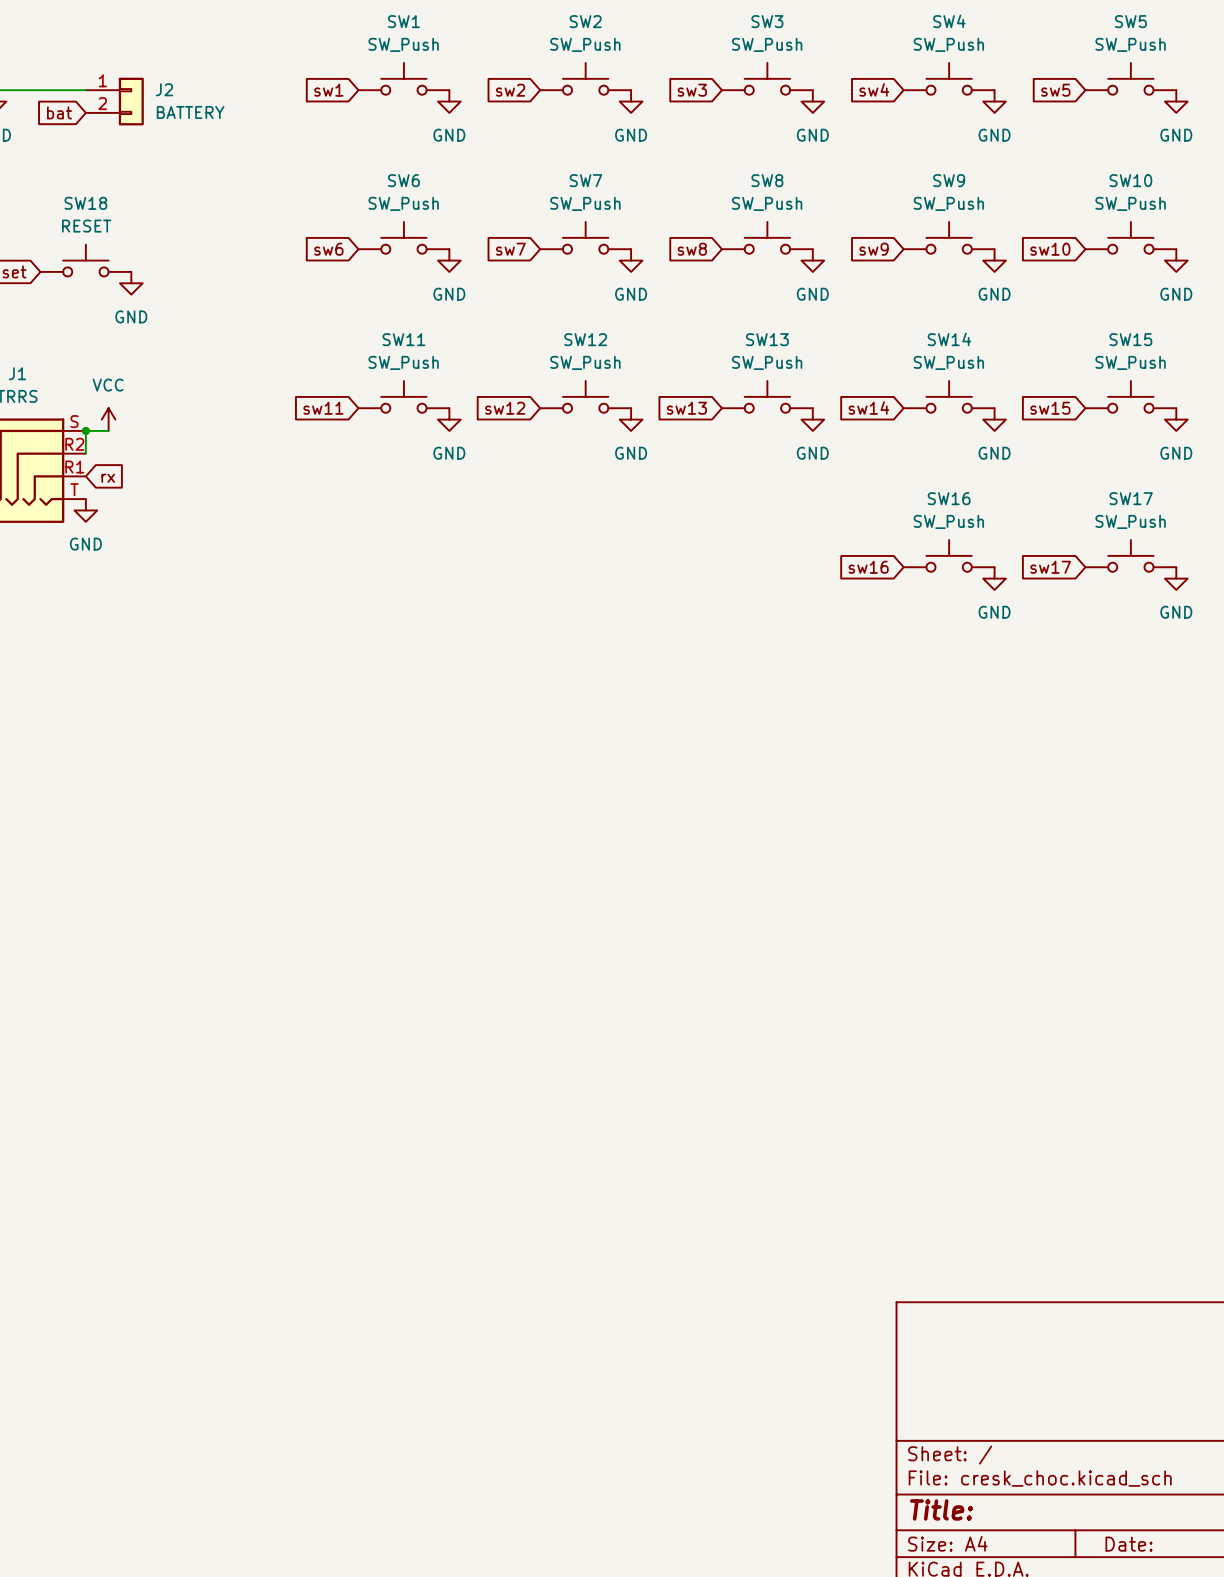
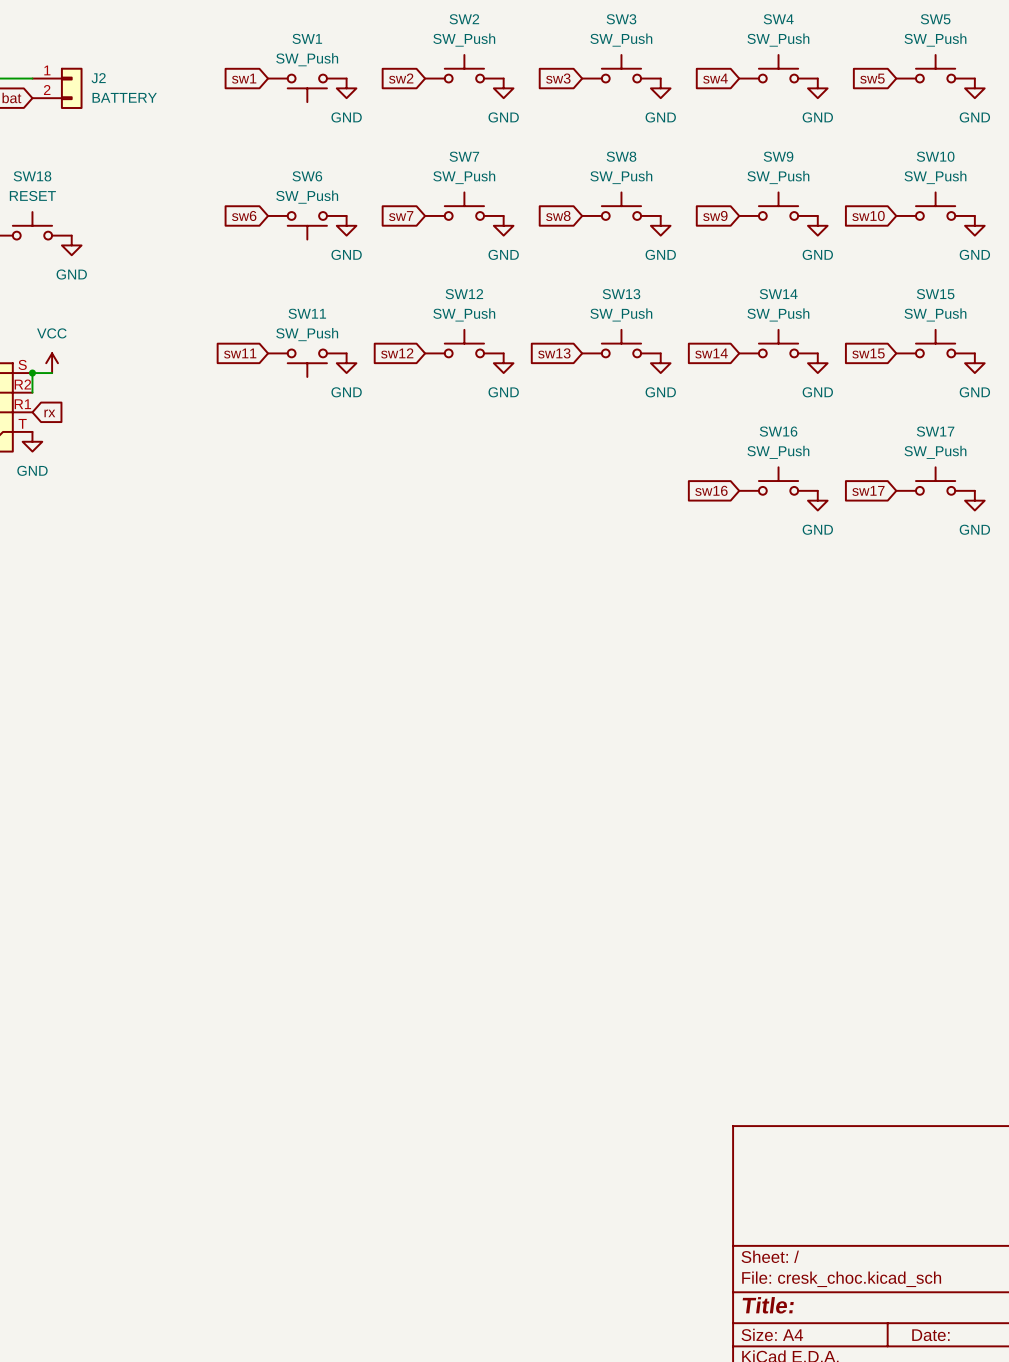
SW1 rotation: 0° (403, 78) -> 180° (307, 88)
SW6 rotation: 0° (403, 237) -> 180° (307, 225)
SW11 rotation: 0° (403, 396) -> 180° (307, 363)

